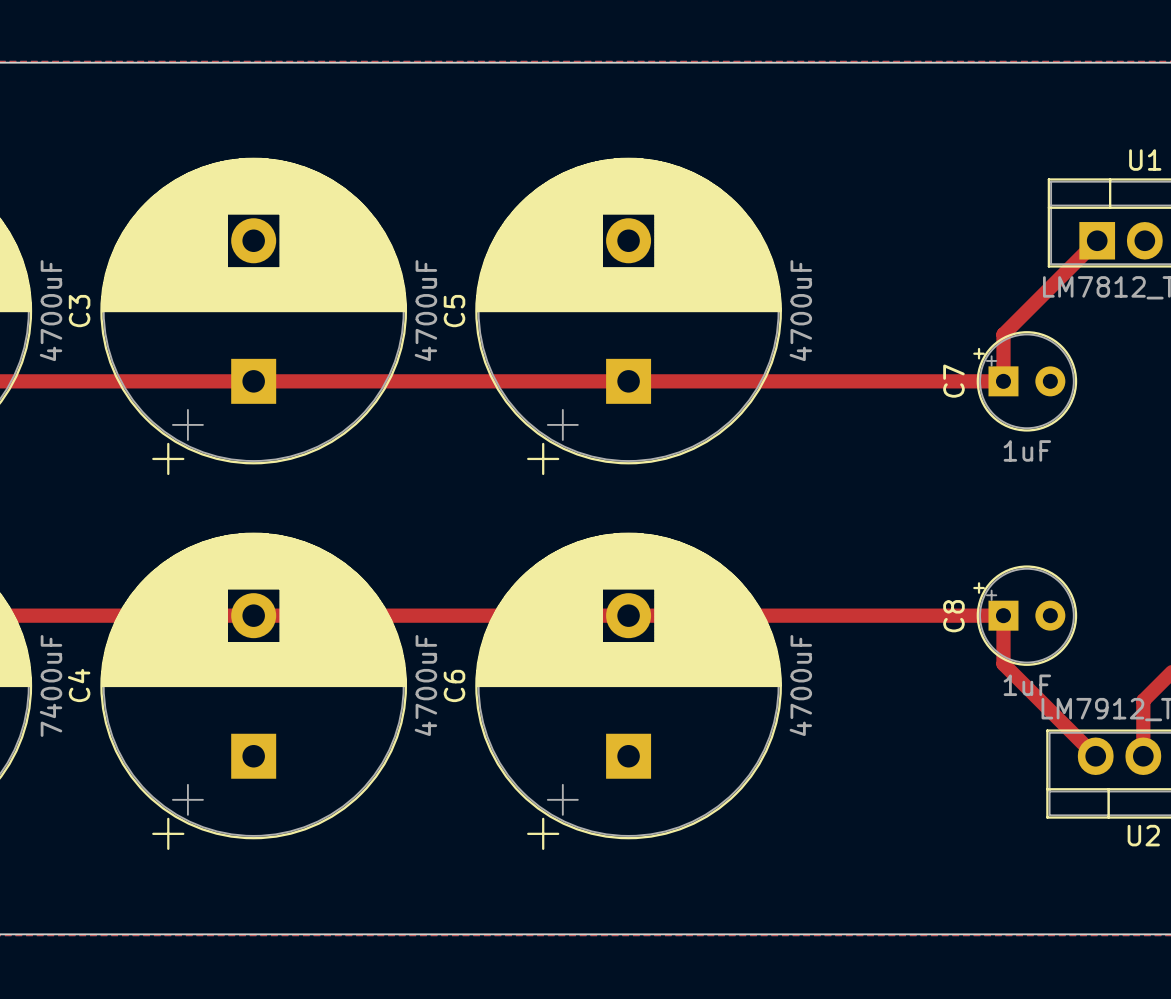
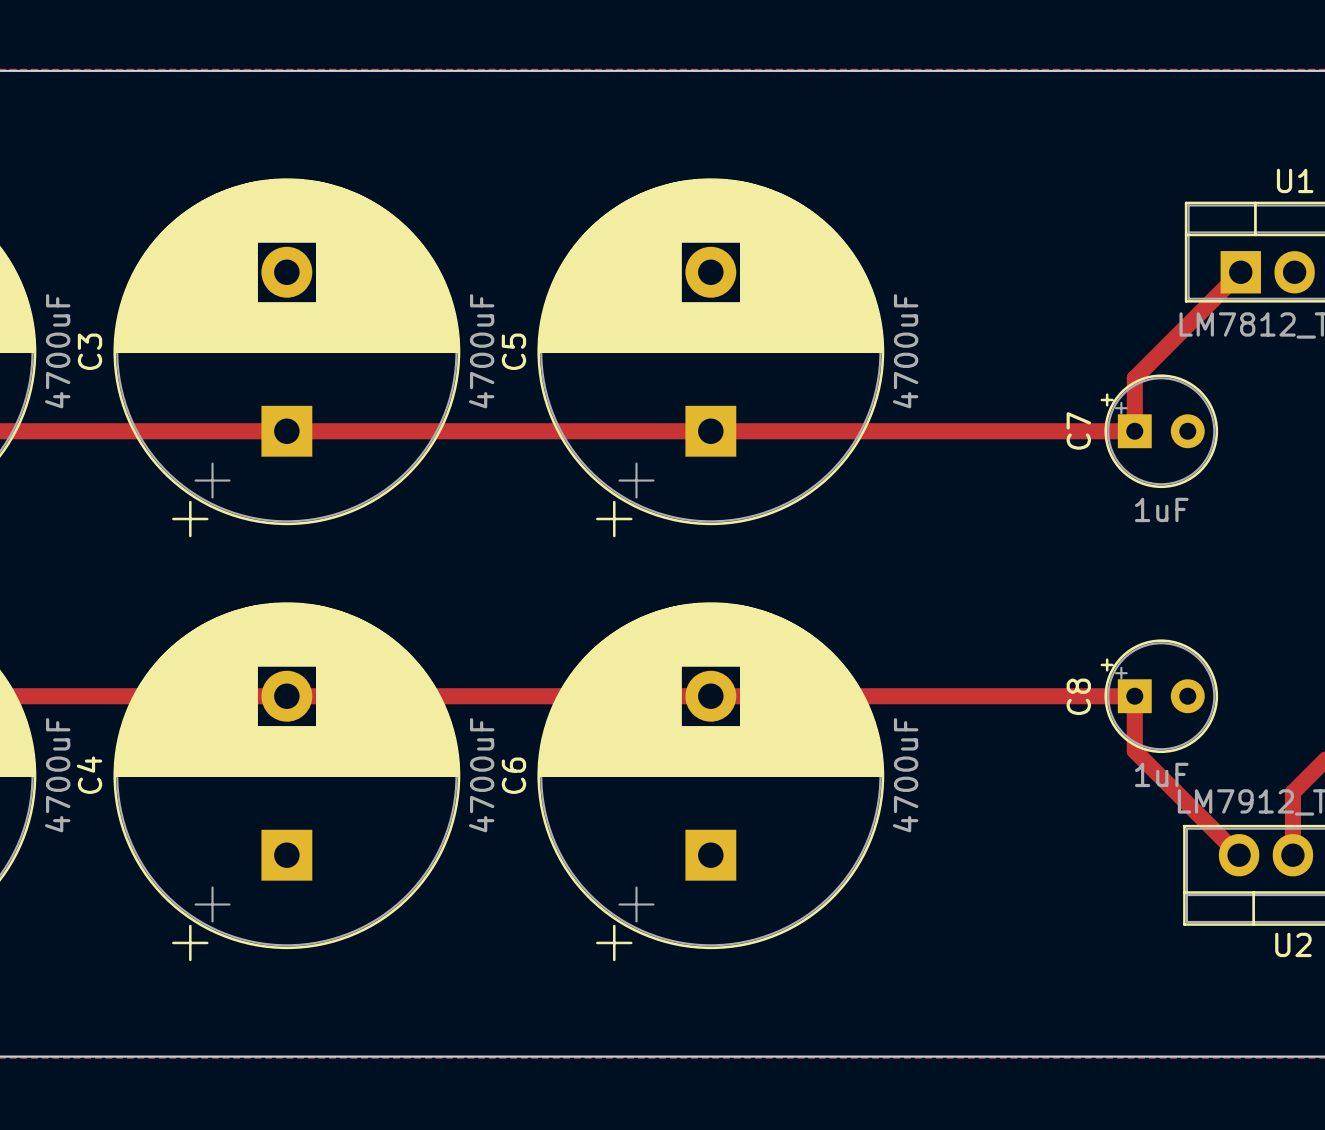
part value: 7400uF (51, 685) -> 4700uF (57, 775)

